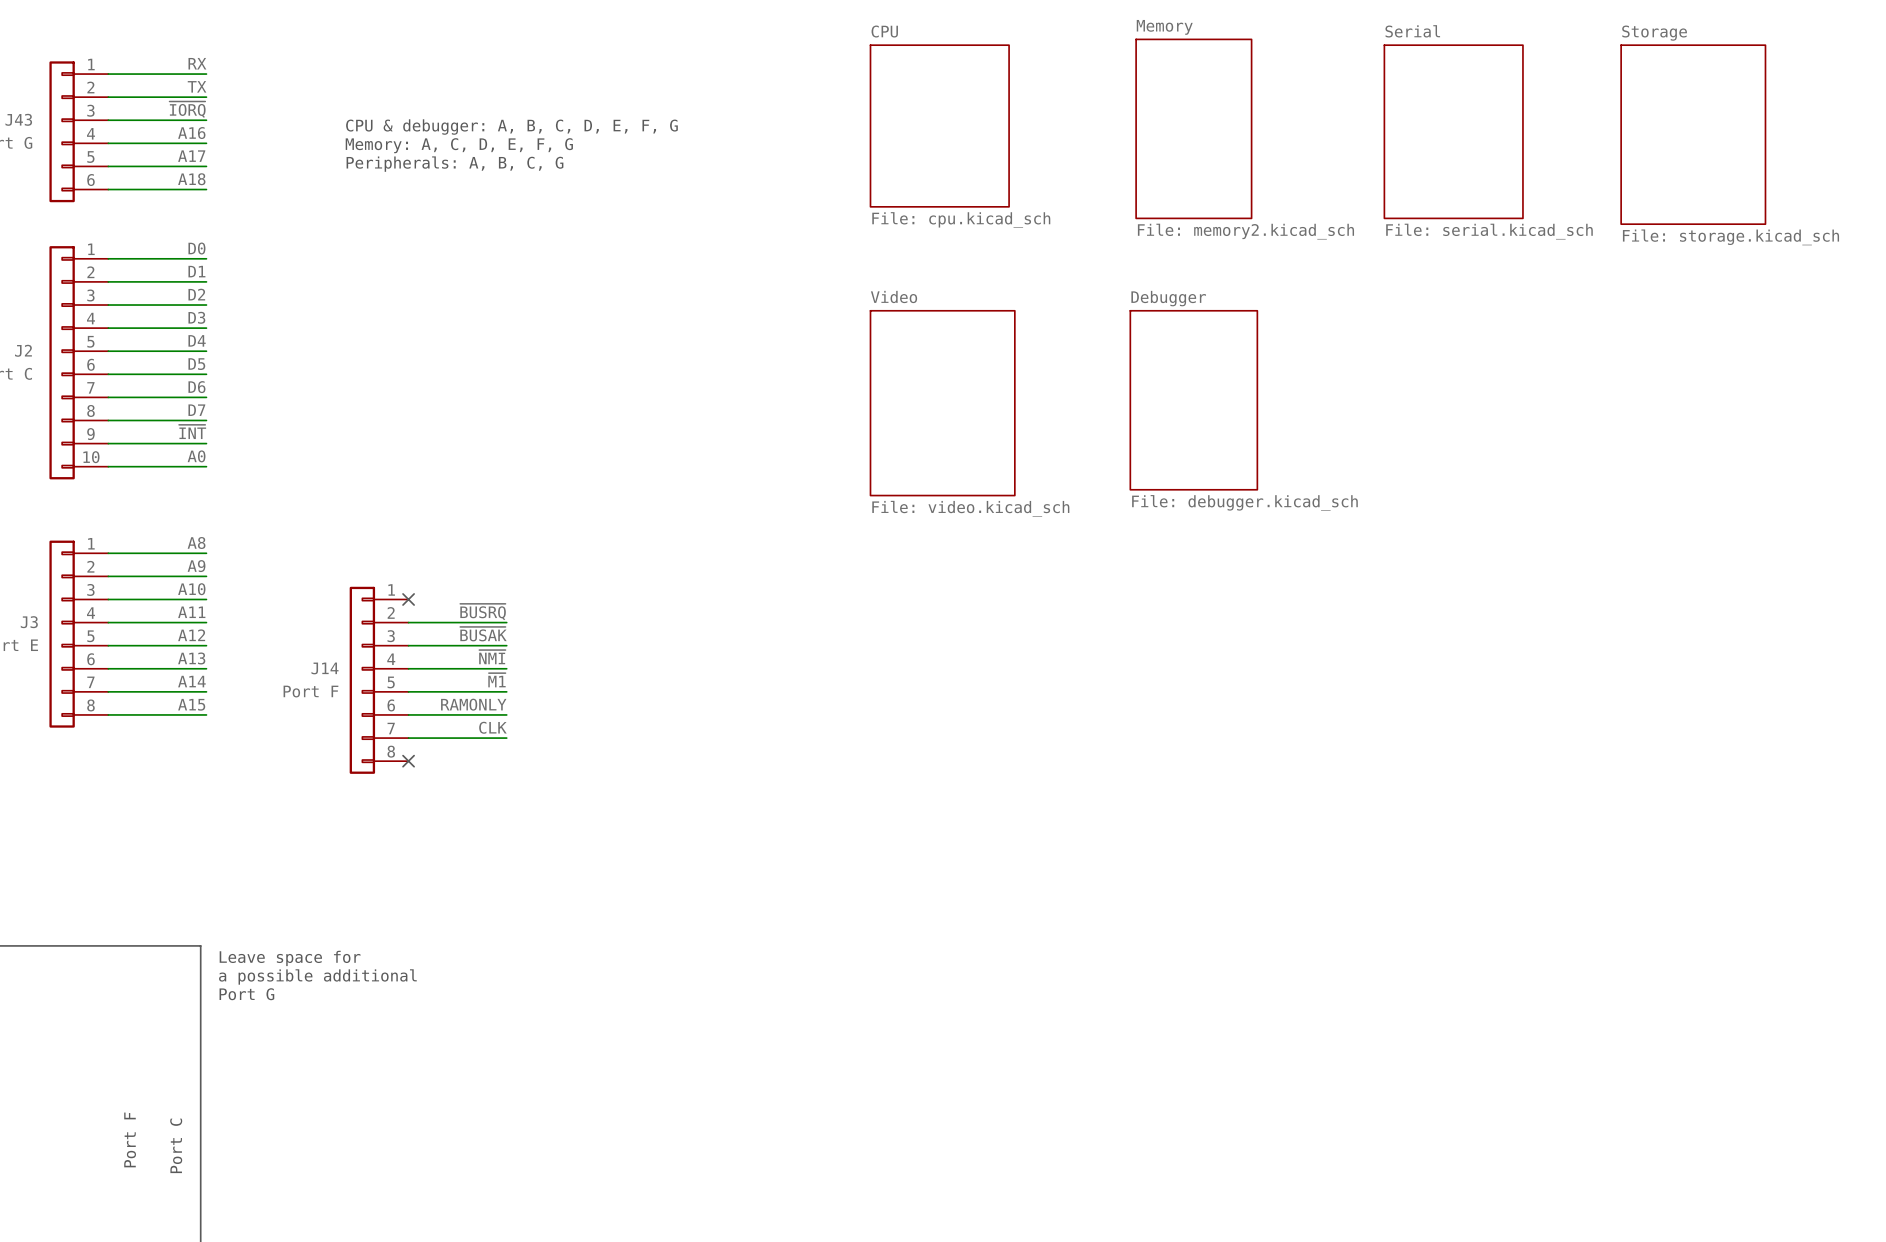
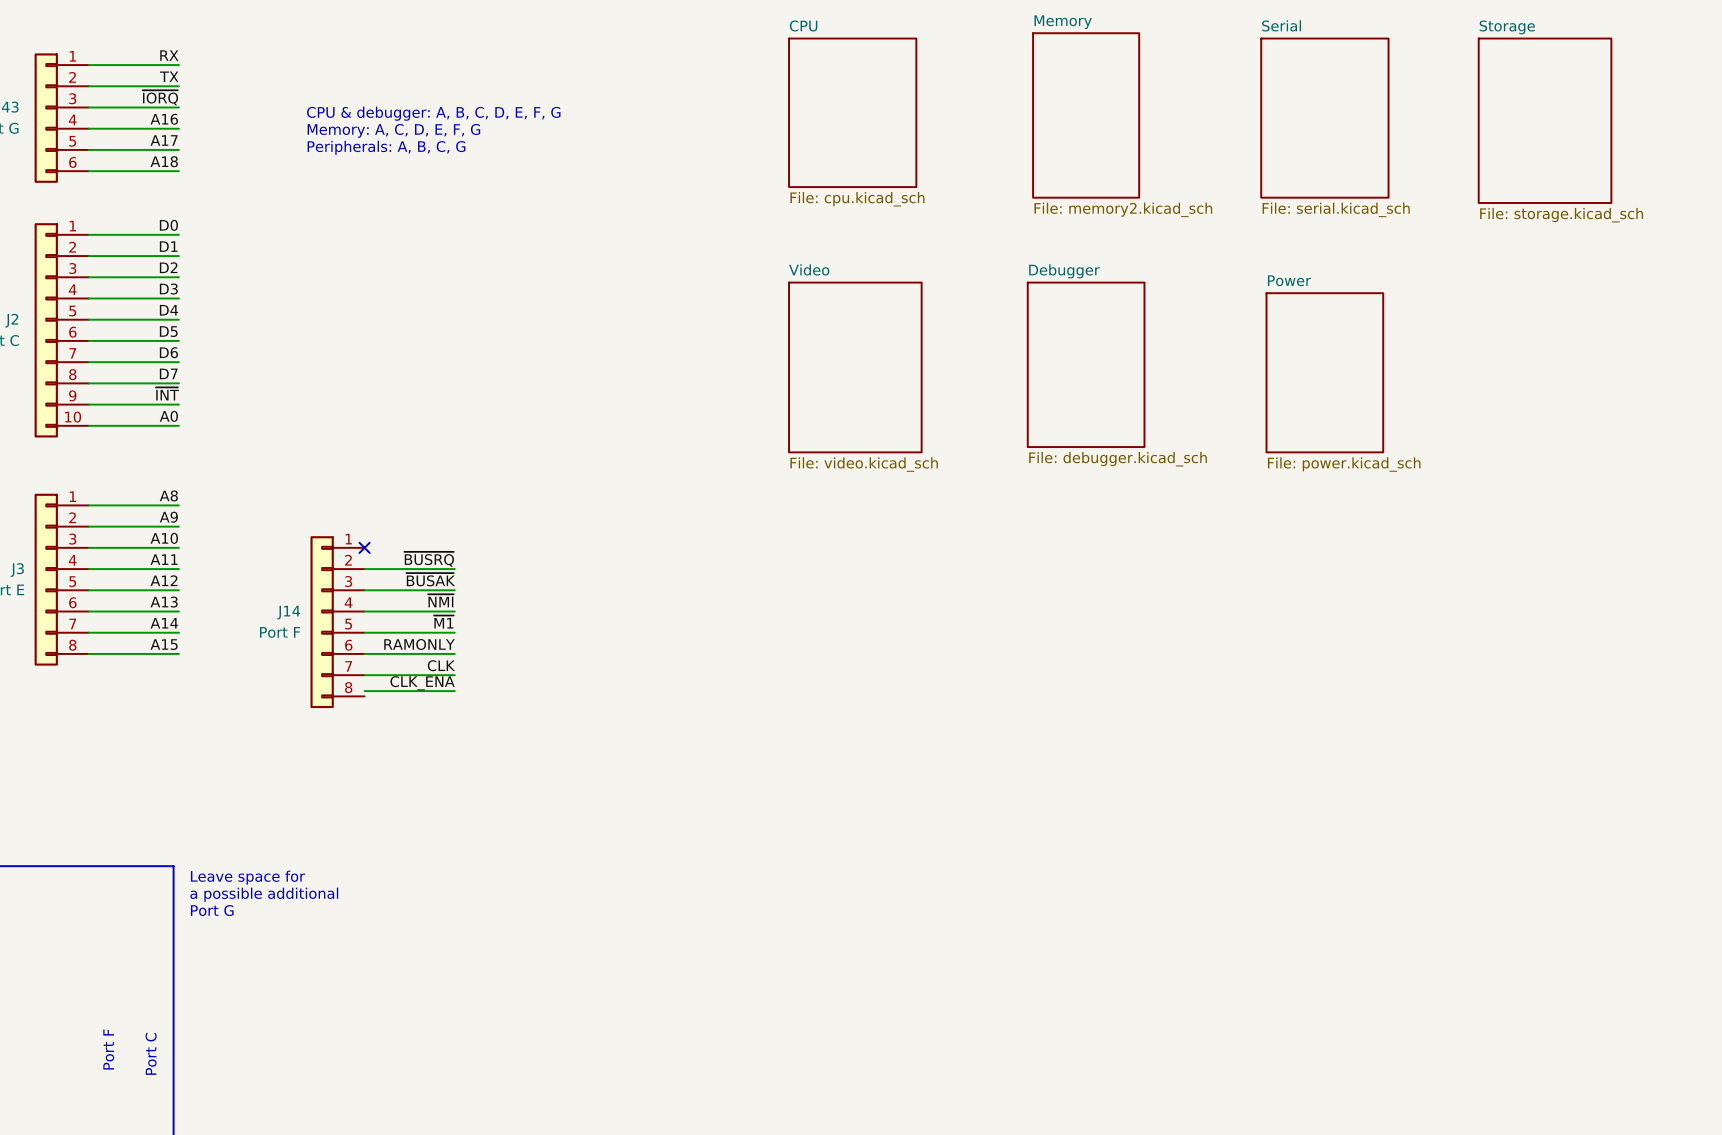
sheet Power: none -> File: power.kicad_sch (1324, 372)
label: none -> CLK_ENA (422, 683)
wire: none -> (364, 691) (454, 691)
no-connect mark: (408, 761) -> none

